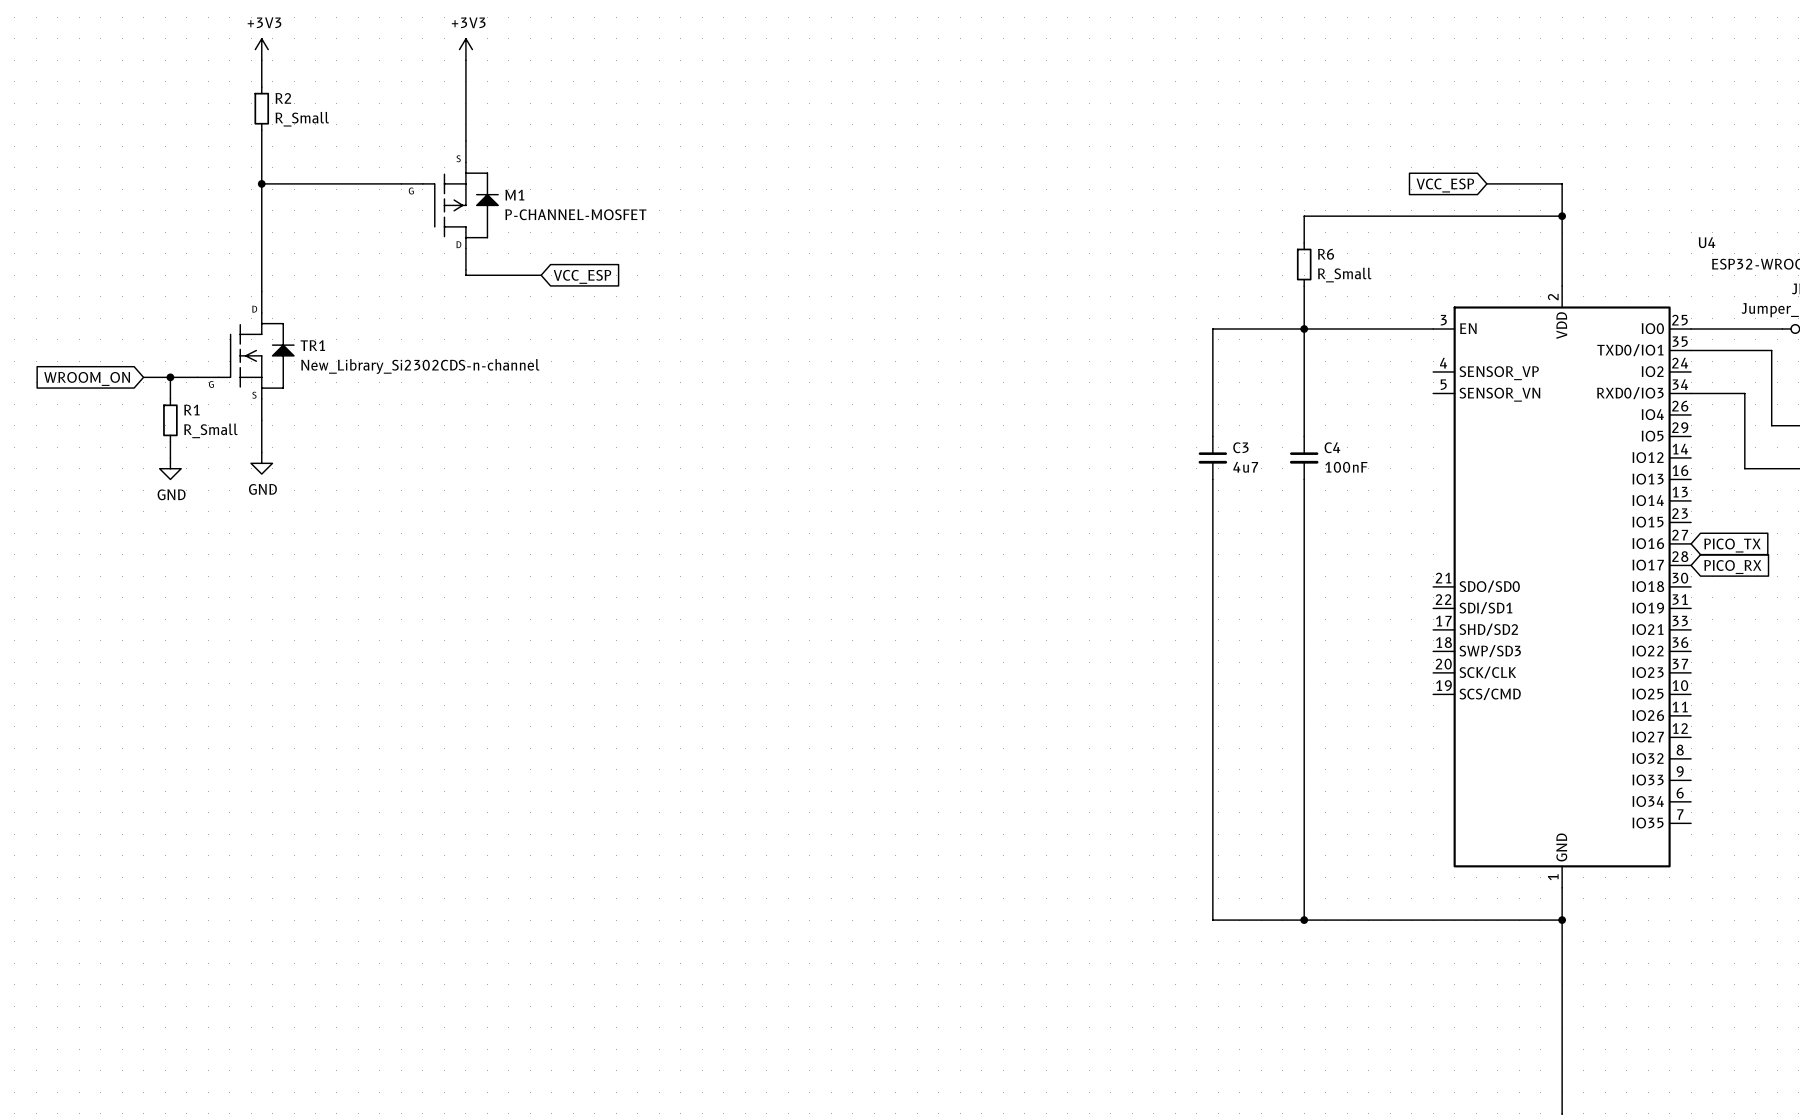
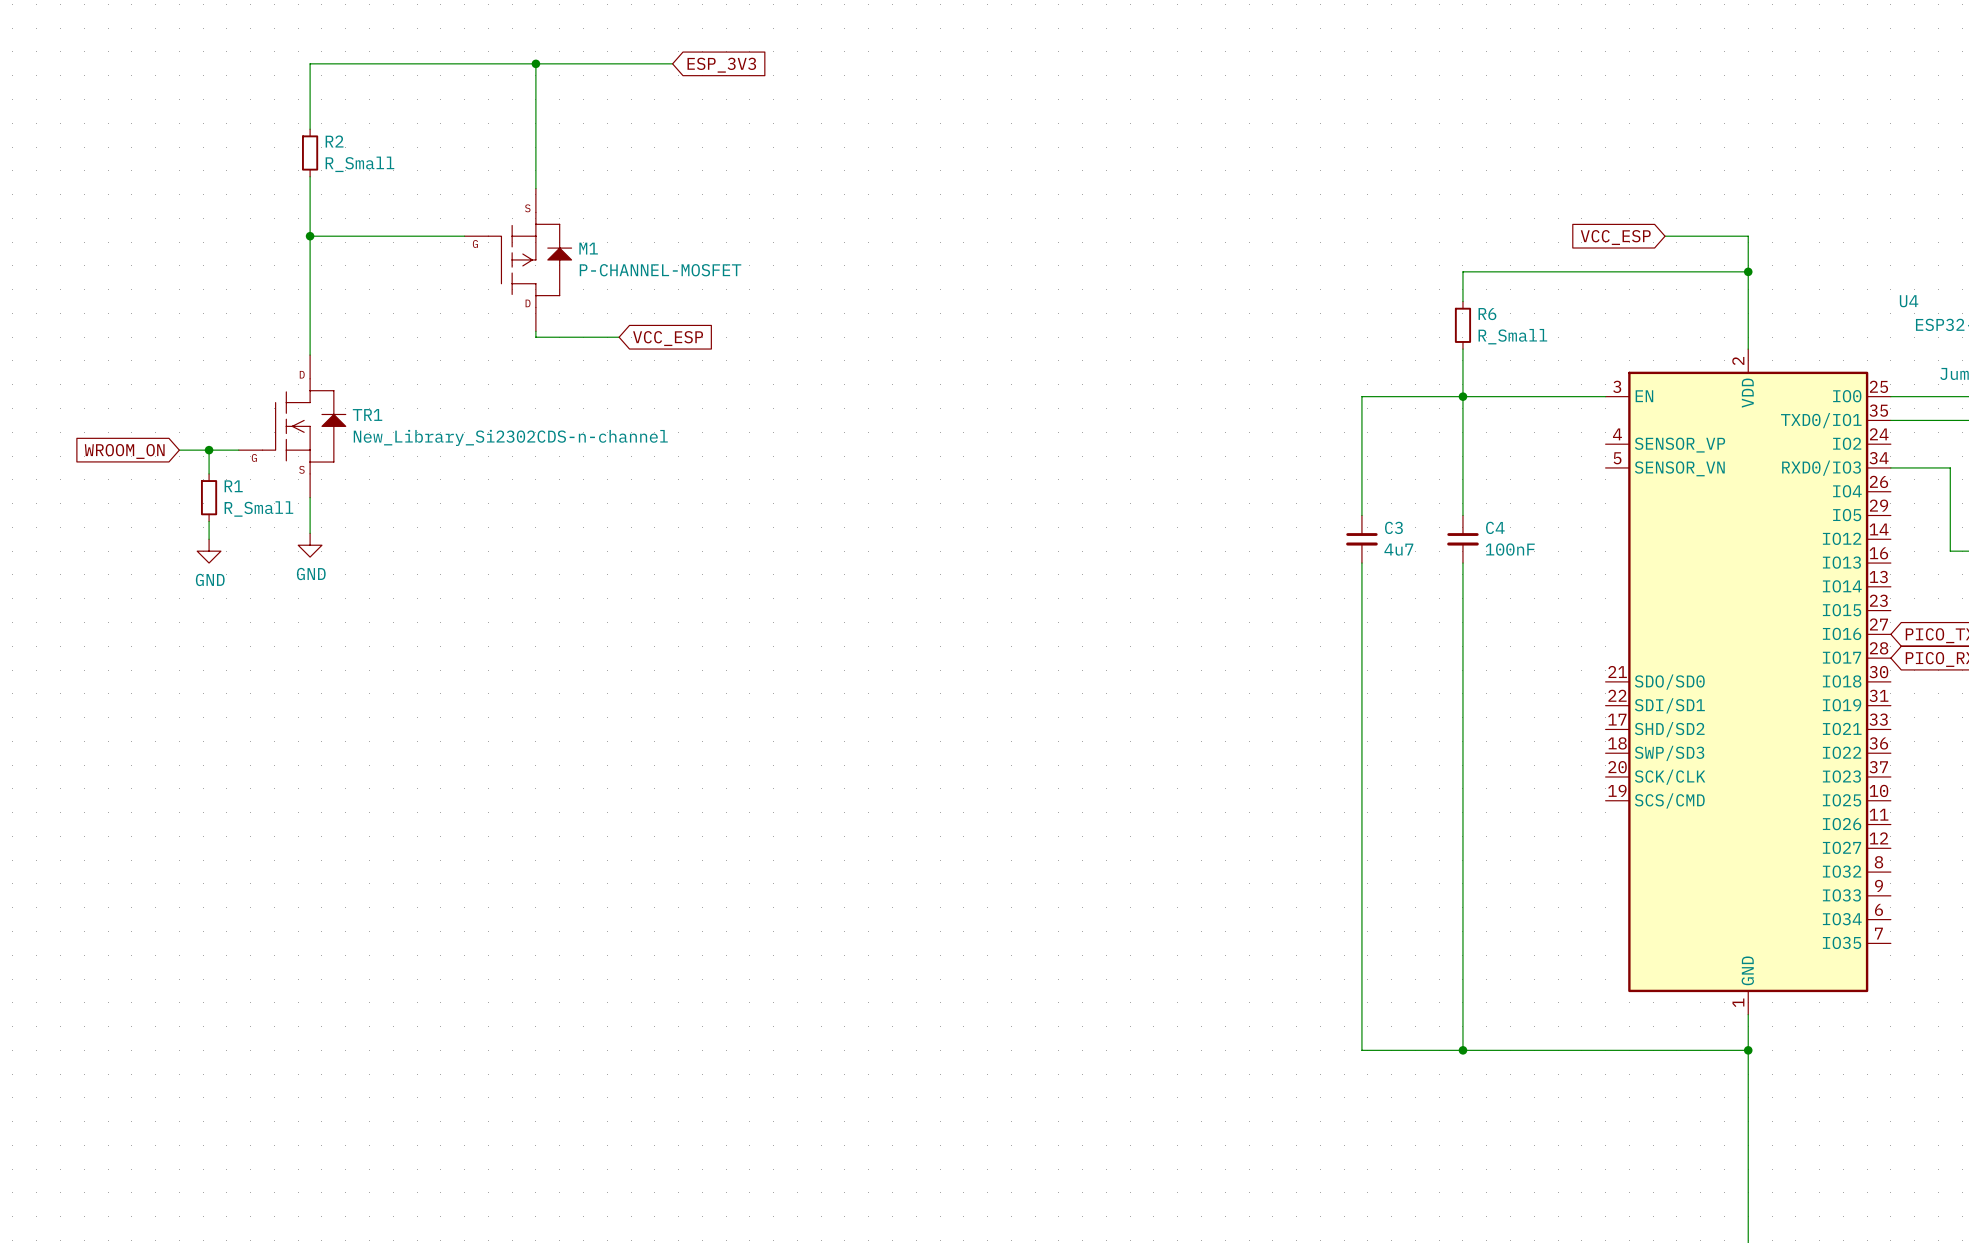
junction: none -> (535, 63)
wire: none -> (672, 63) (310, 63) (310, 99)
global label: none -> ESP_3V3 (721, 65)
power symbol: +3V3 (261, 49) -> none
power symbol: +3V3 (465, 49) -> none

